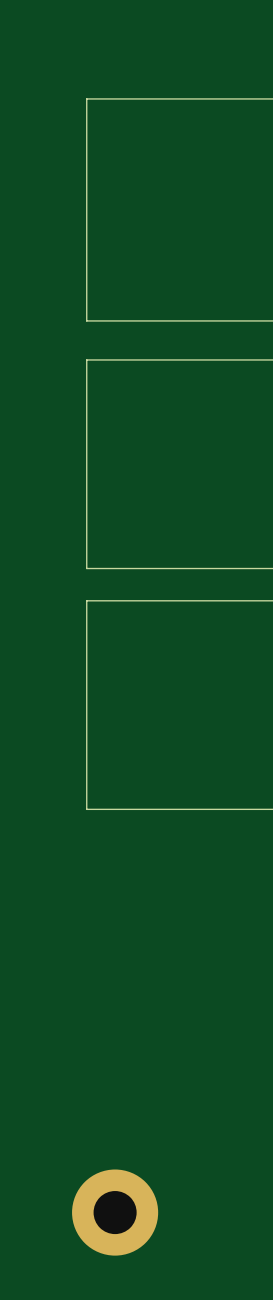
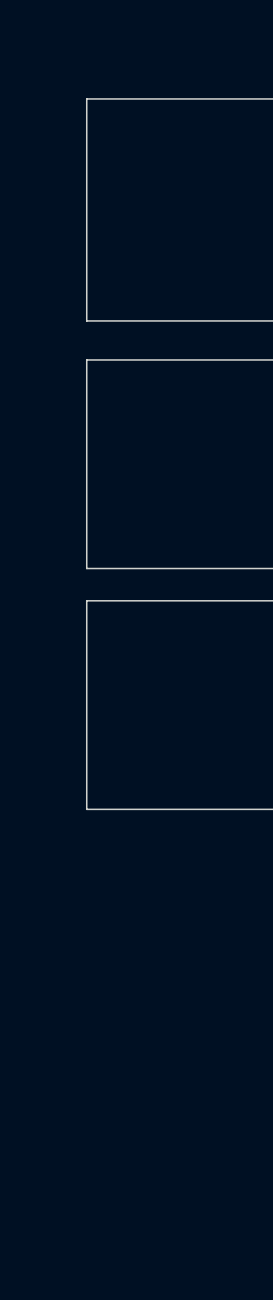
part: (115, 1212) -> none

